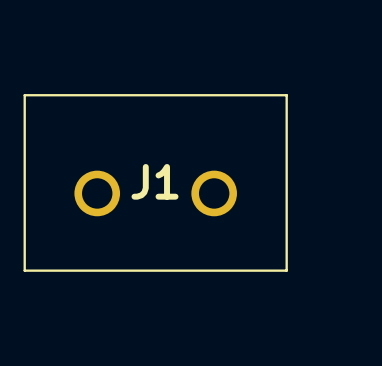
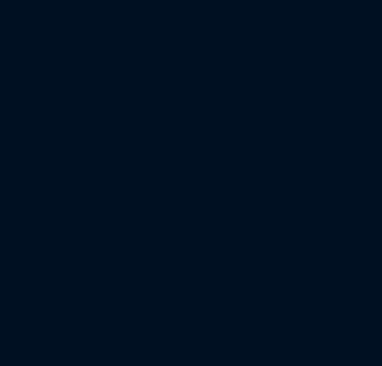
J1: (155, 182) -> none

